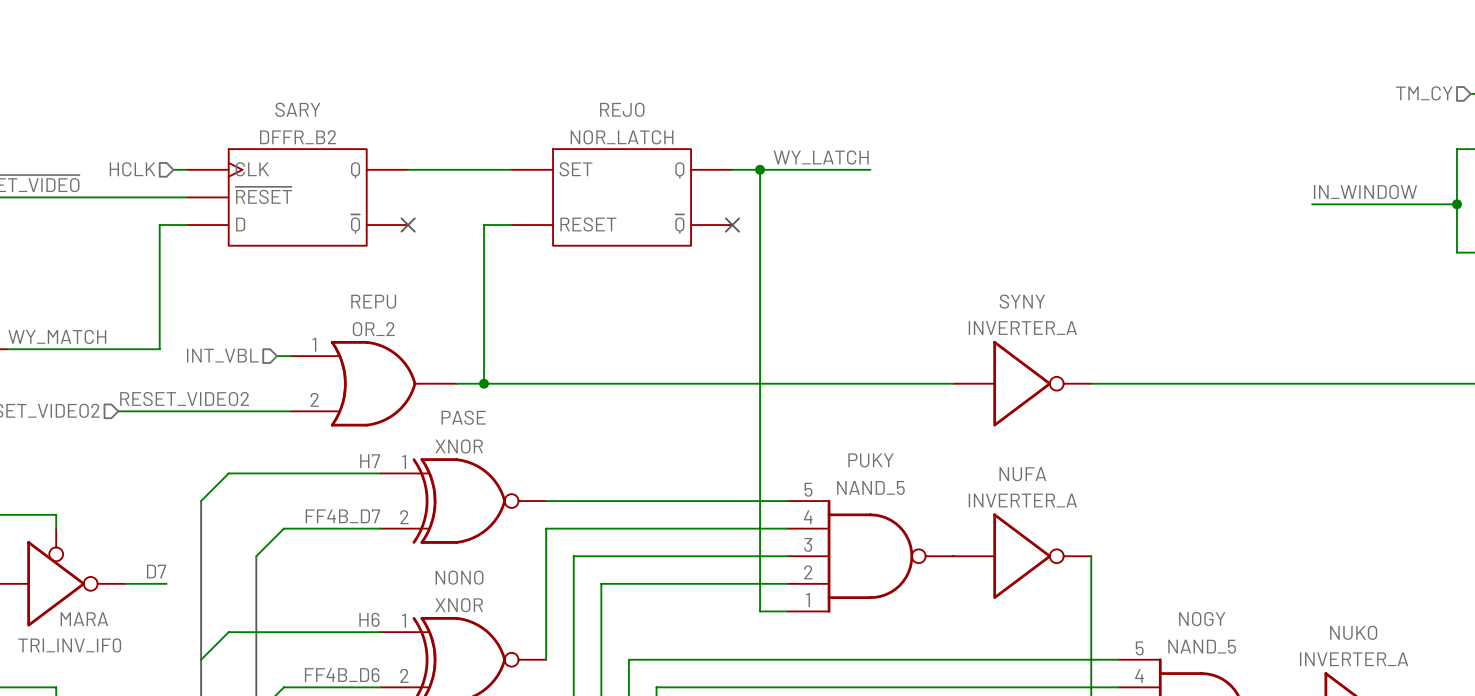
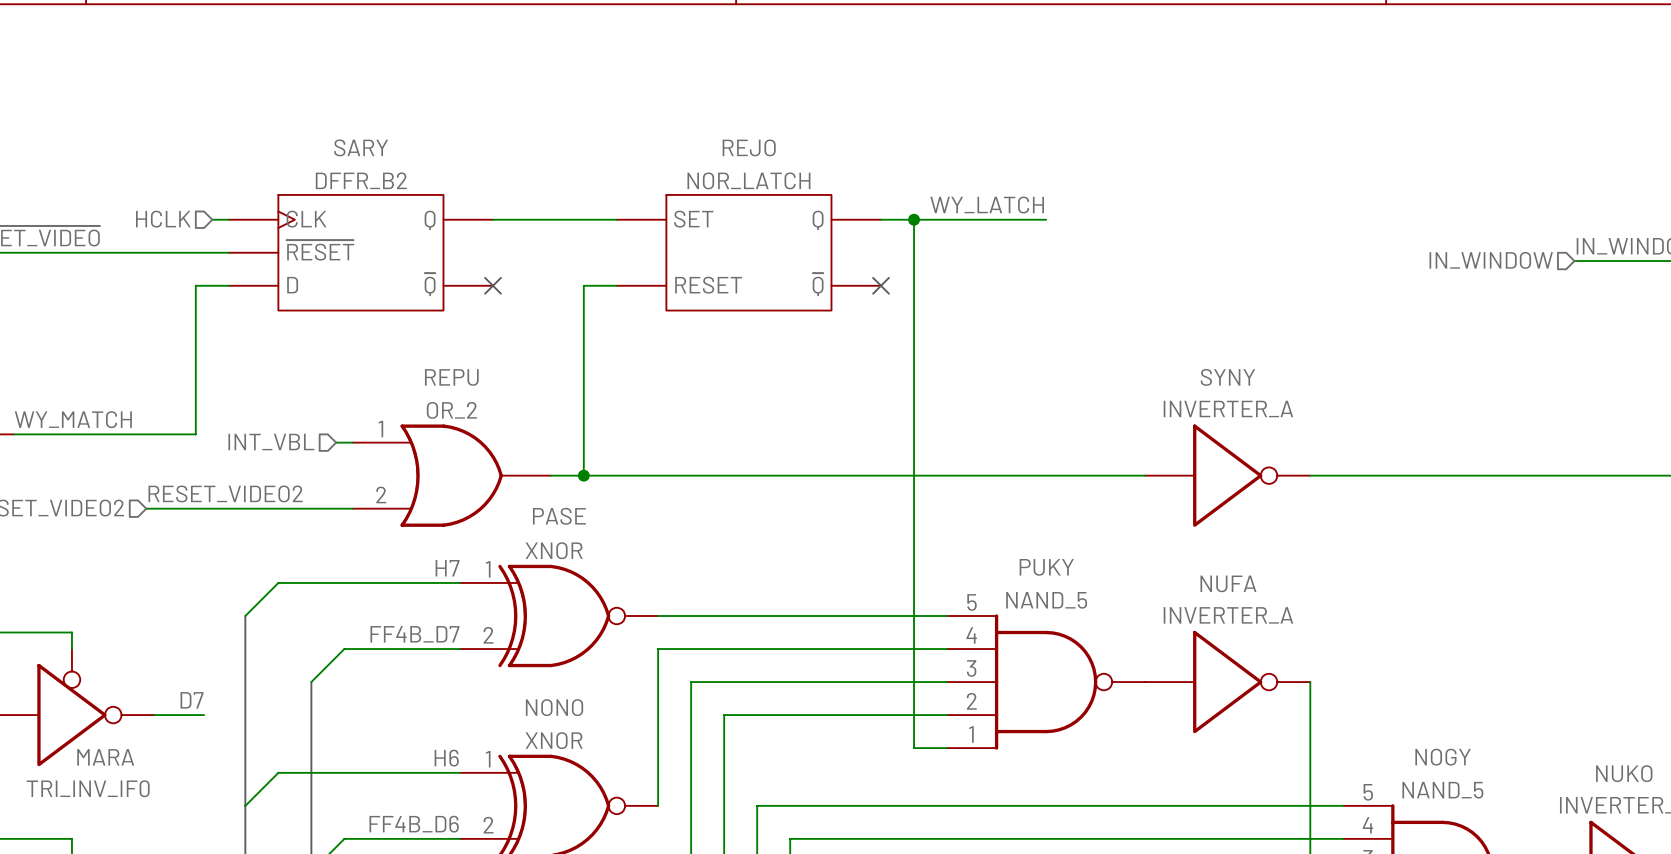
hierarchical label: none -> IN_WINDOW (1491, 260)

